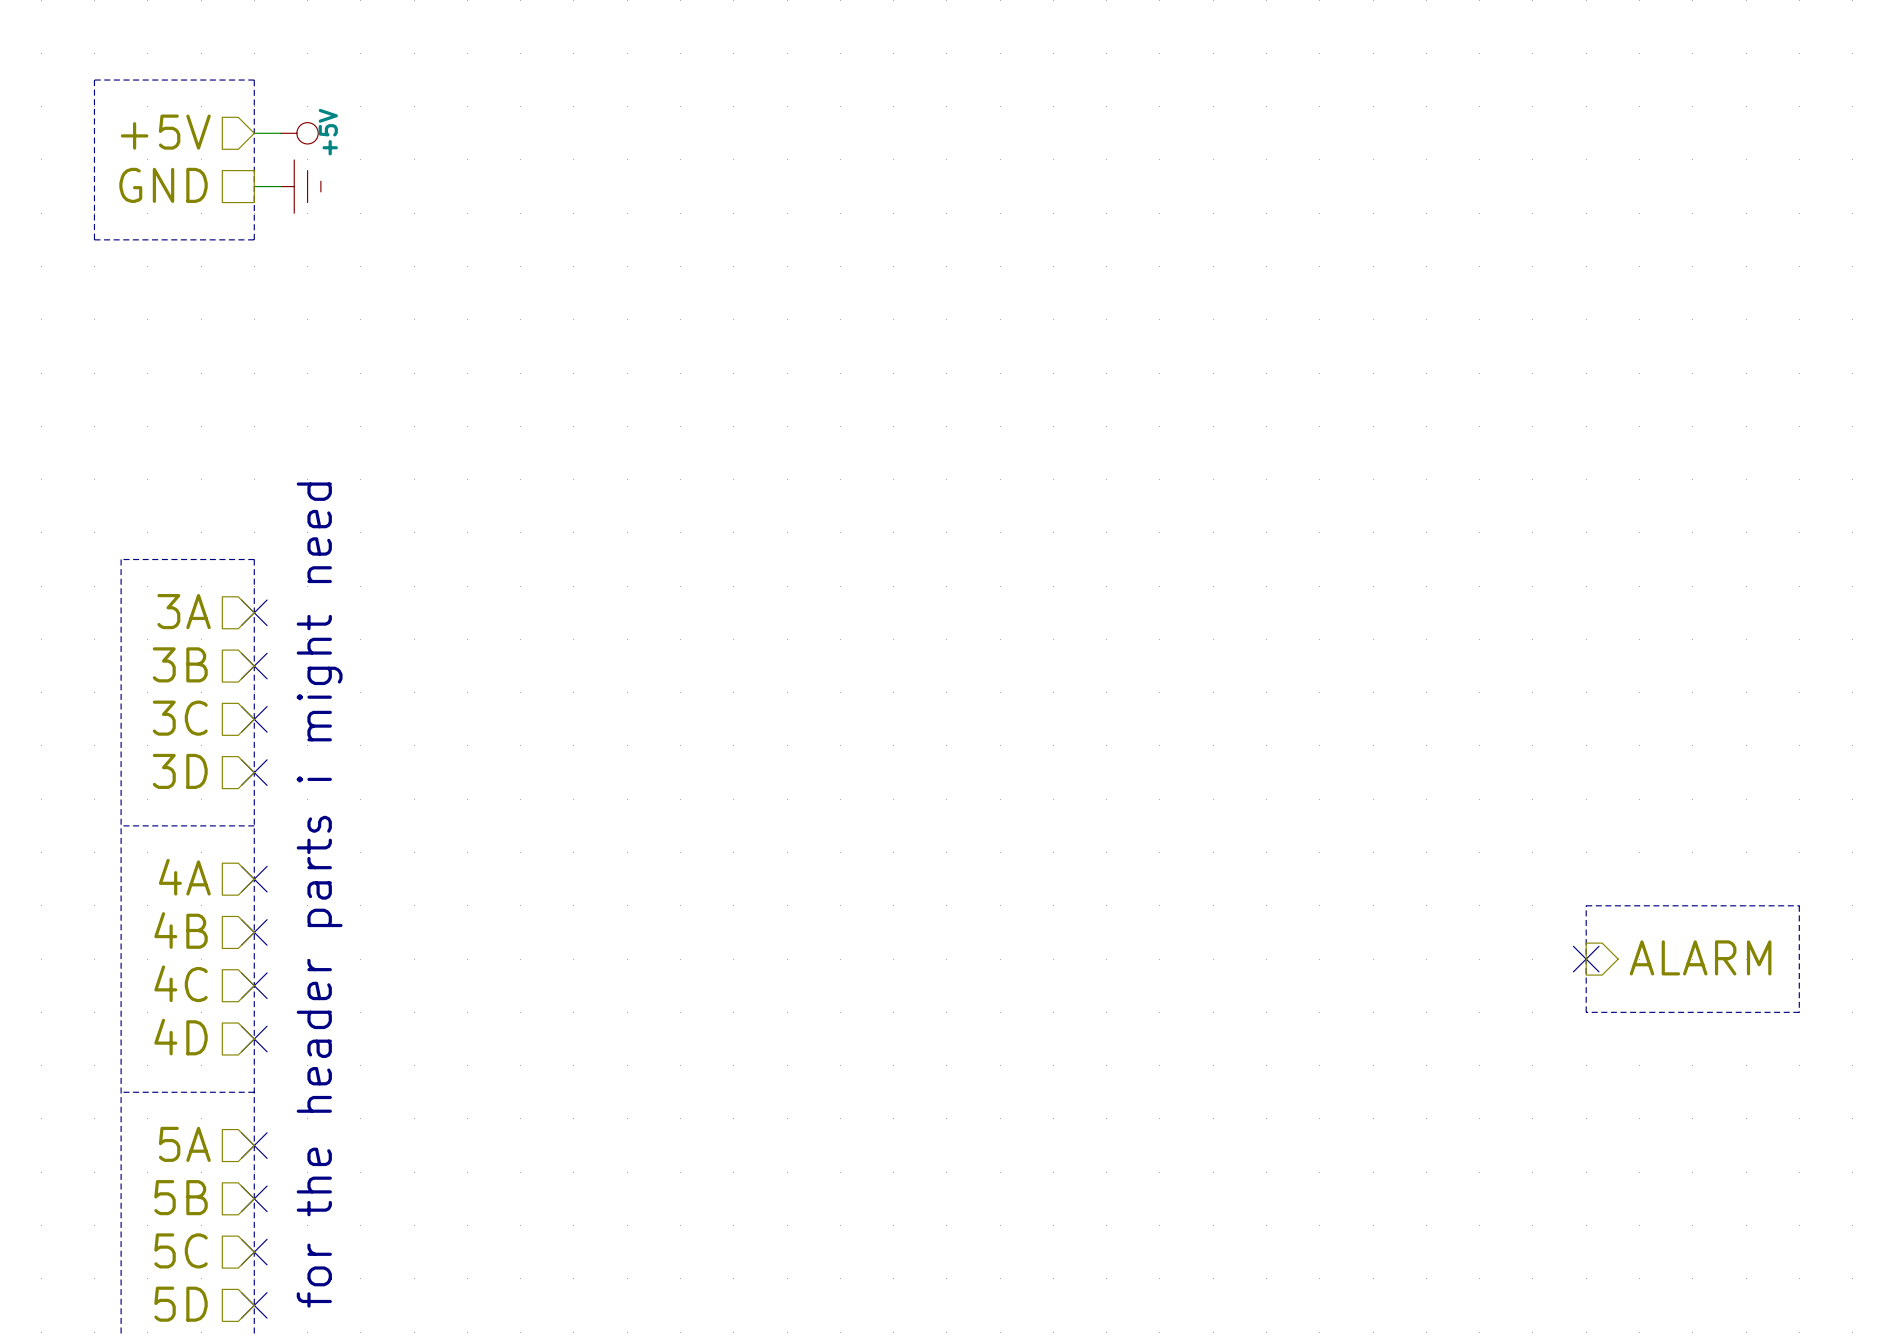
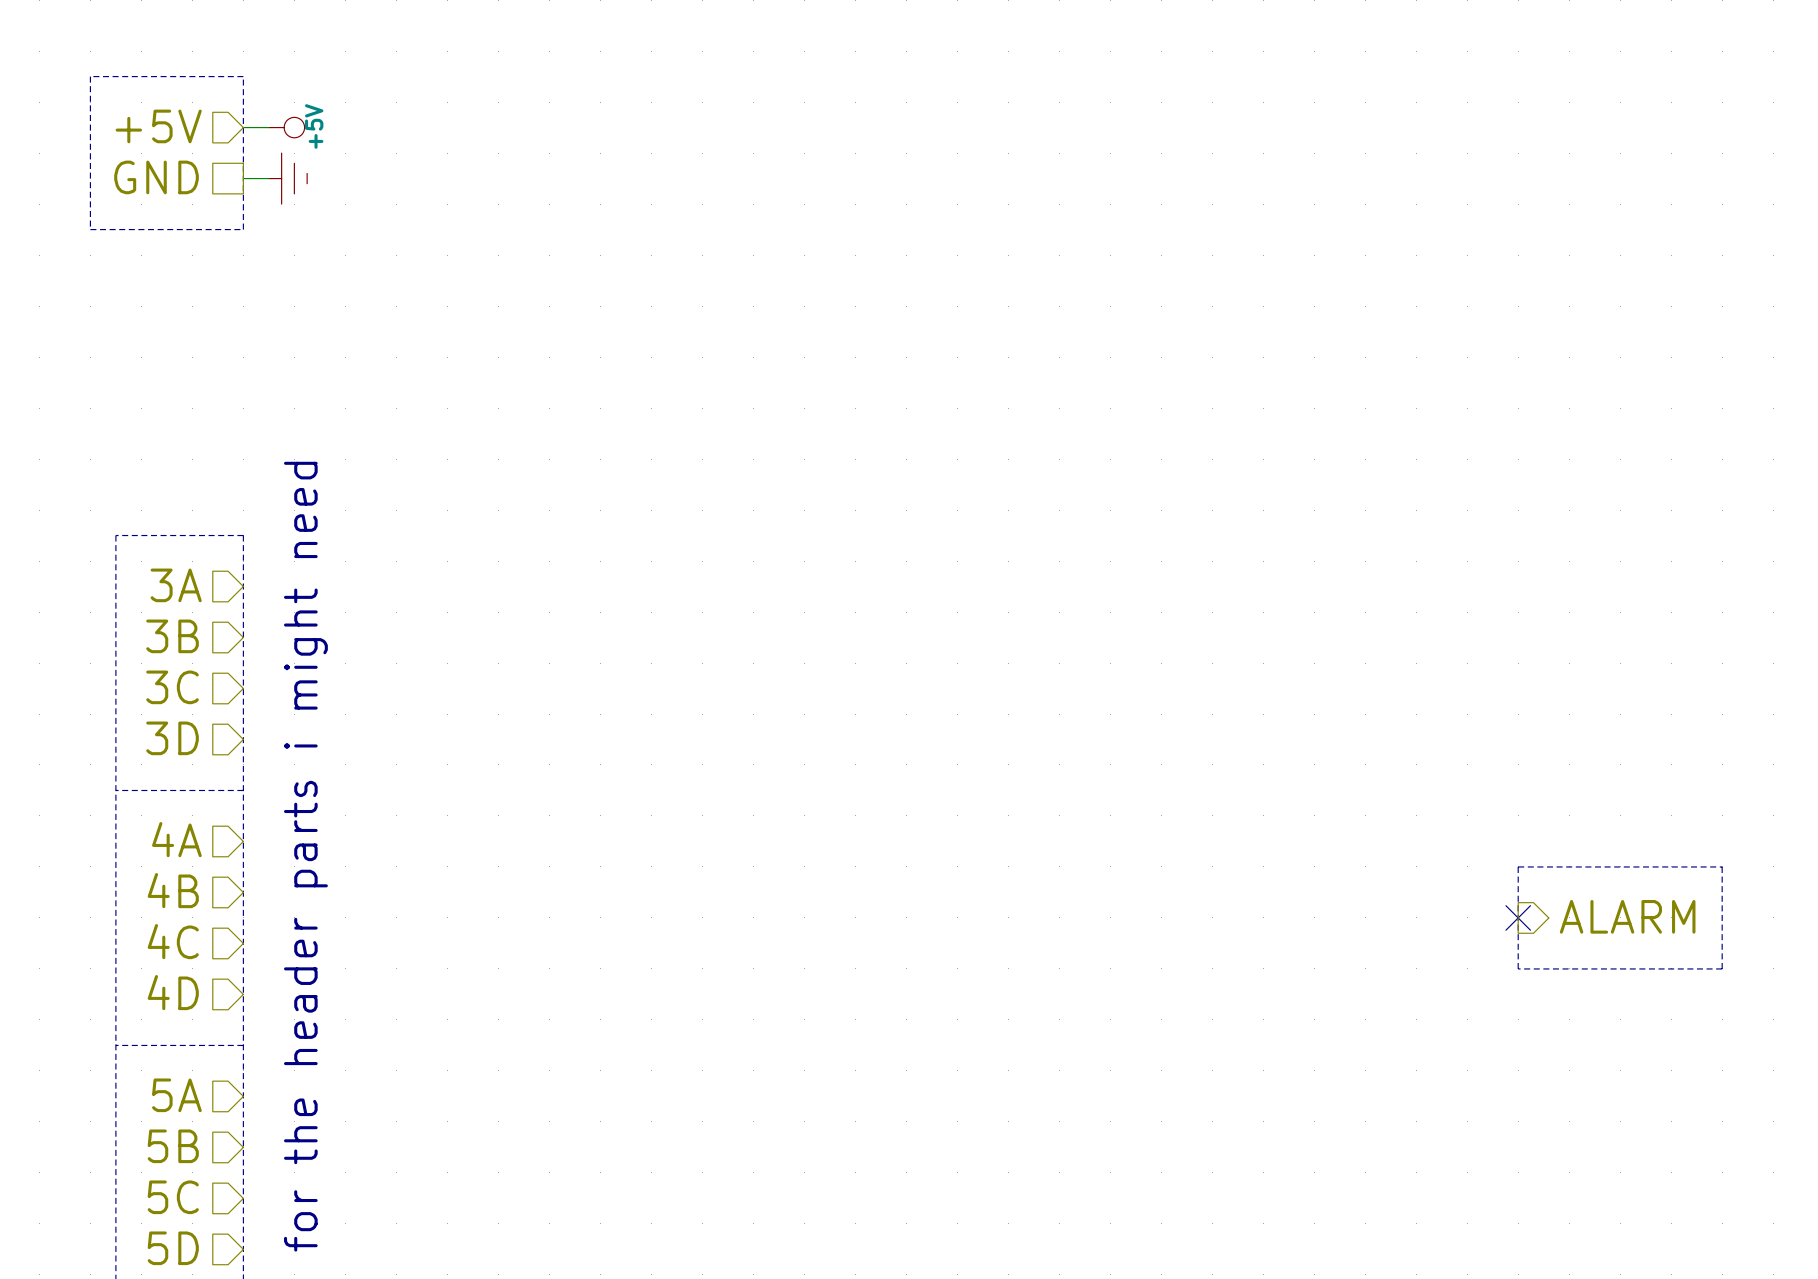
no-connect mark: (254, 612) -> none
no-connect mark: (254, 666) -> none
no-connect mark: (254, 719) -> none
no-connect mark: (254, 772) -> none
no-connect mark: (254, 879) -> none
no-connect mark: (254, 932) -> none
no-connect mark: (254, 985) -> none
no-connect mark: (254, 1039) -> none
no-connect mark: (254, 1145) -> none
no-connect mark: (254, 1198) -> none
no-connect mark: (254, 1252) -> none
no-connect mark: (254, 1305) -> none

